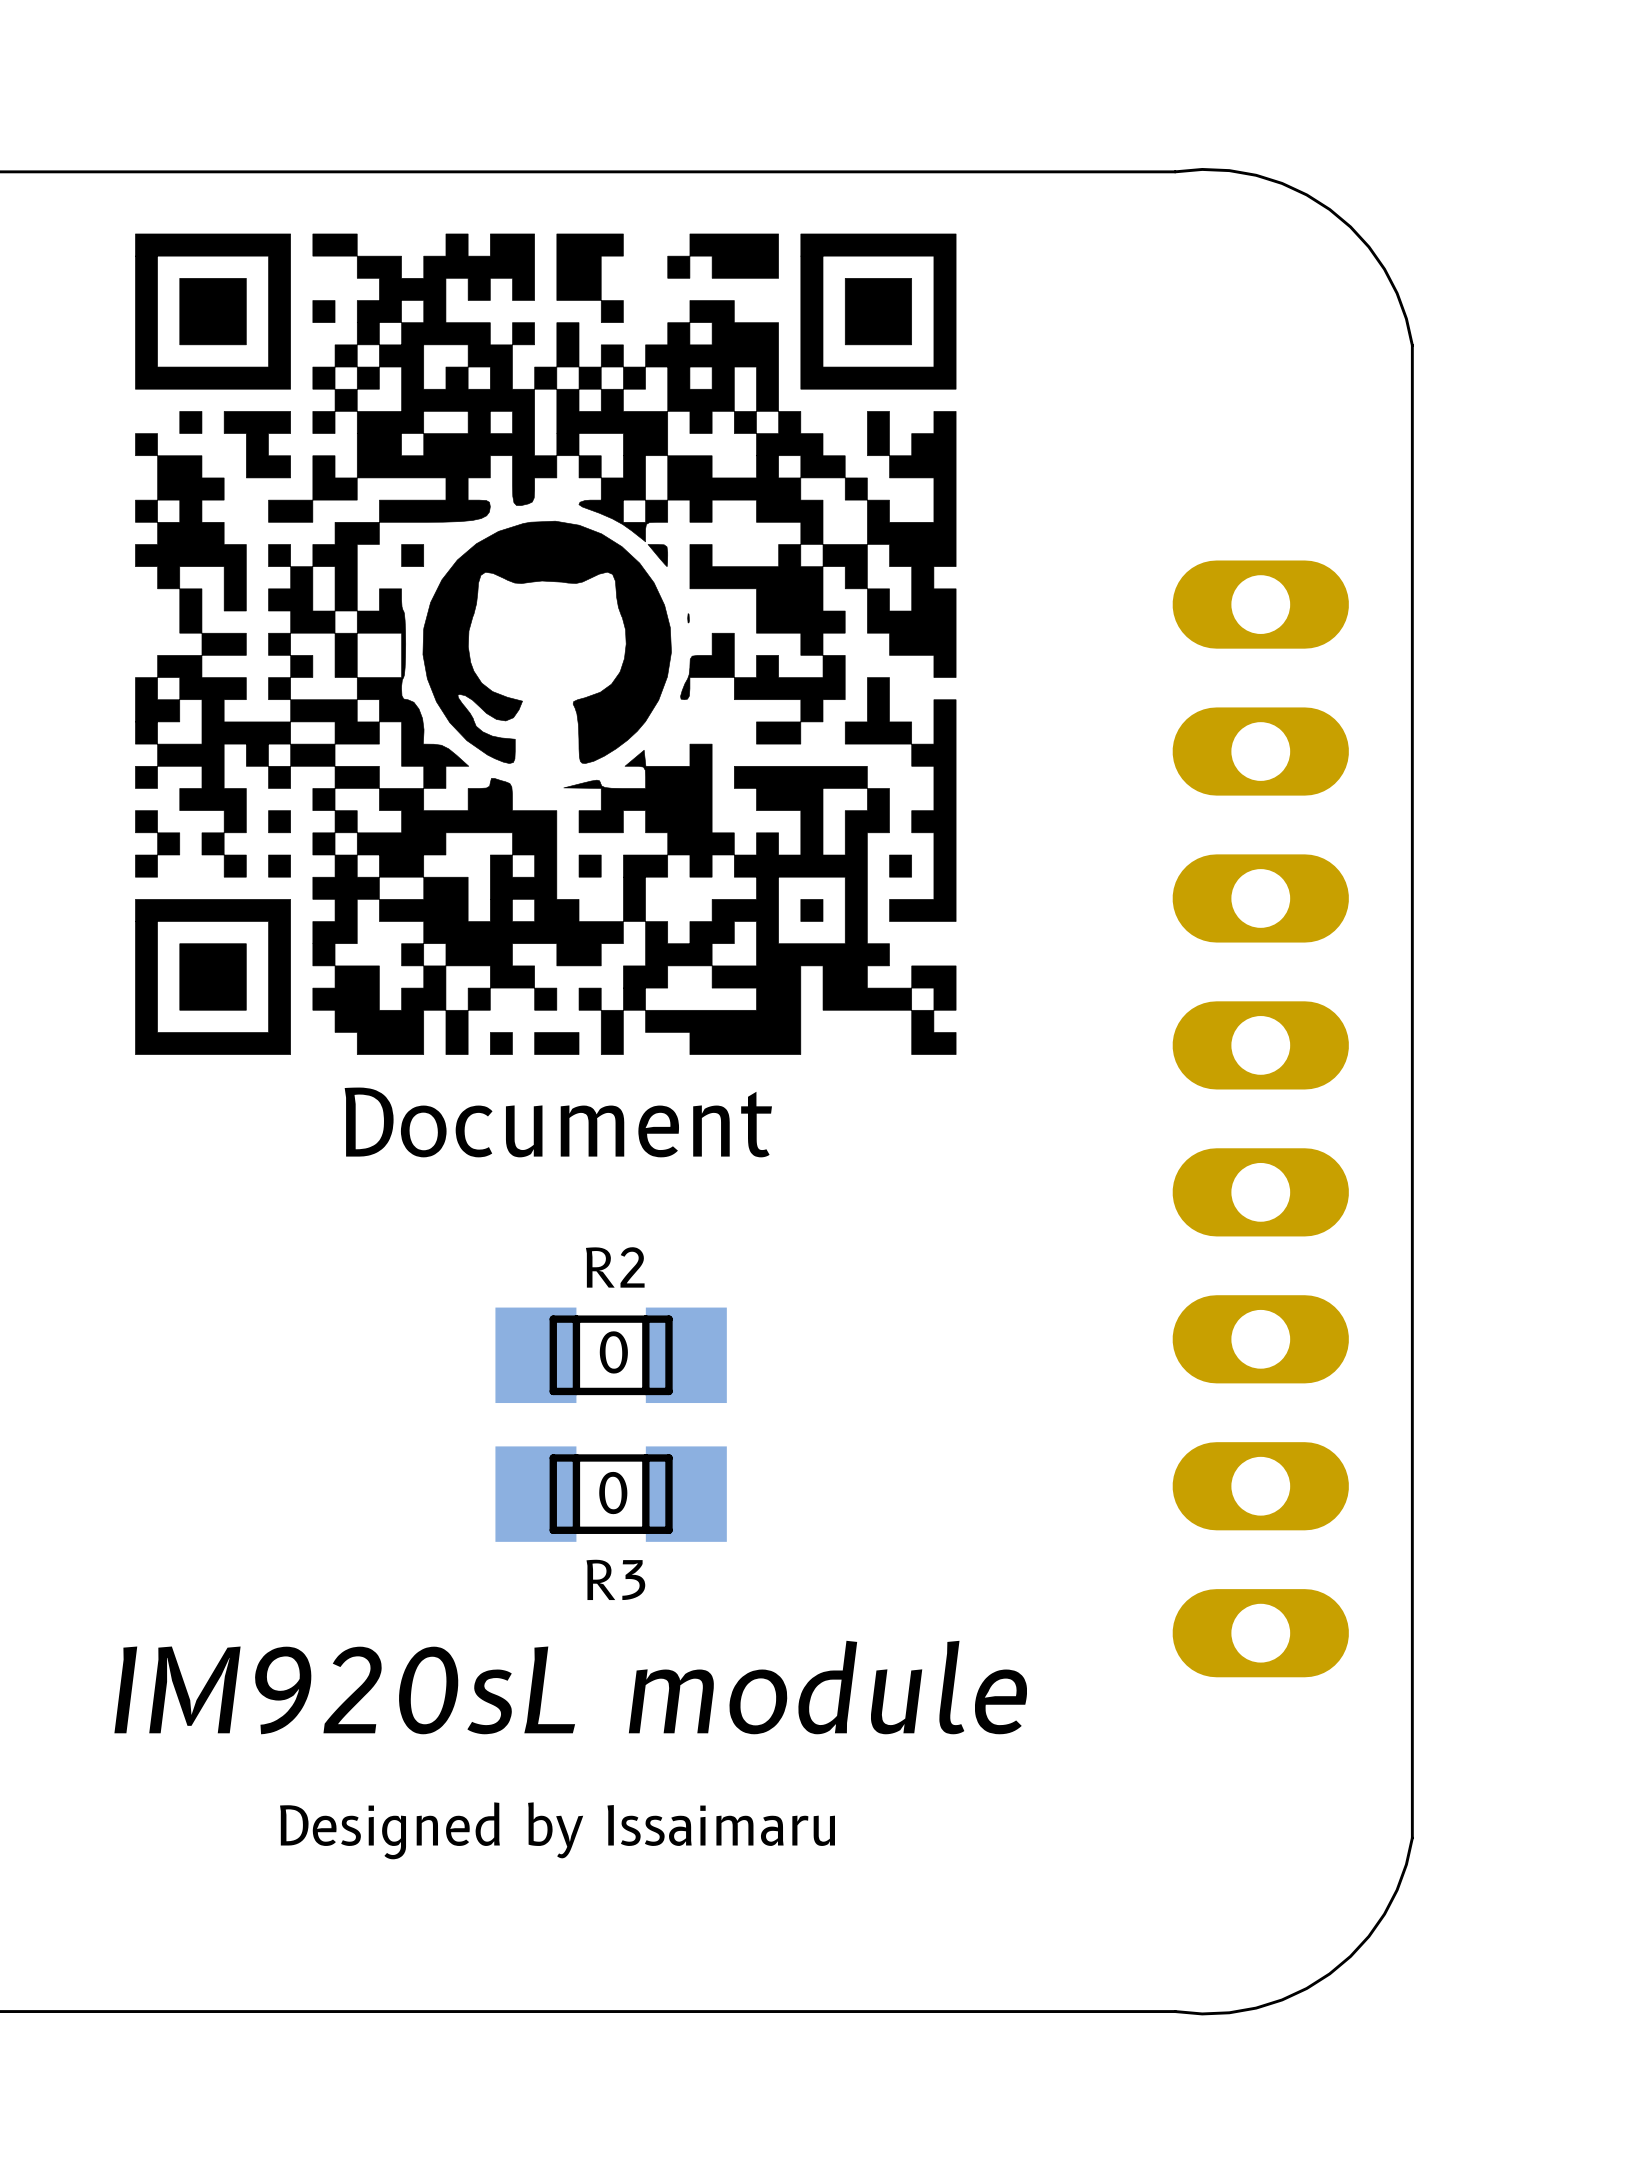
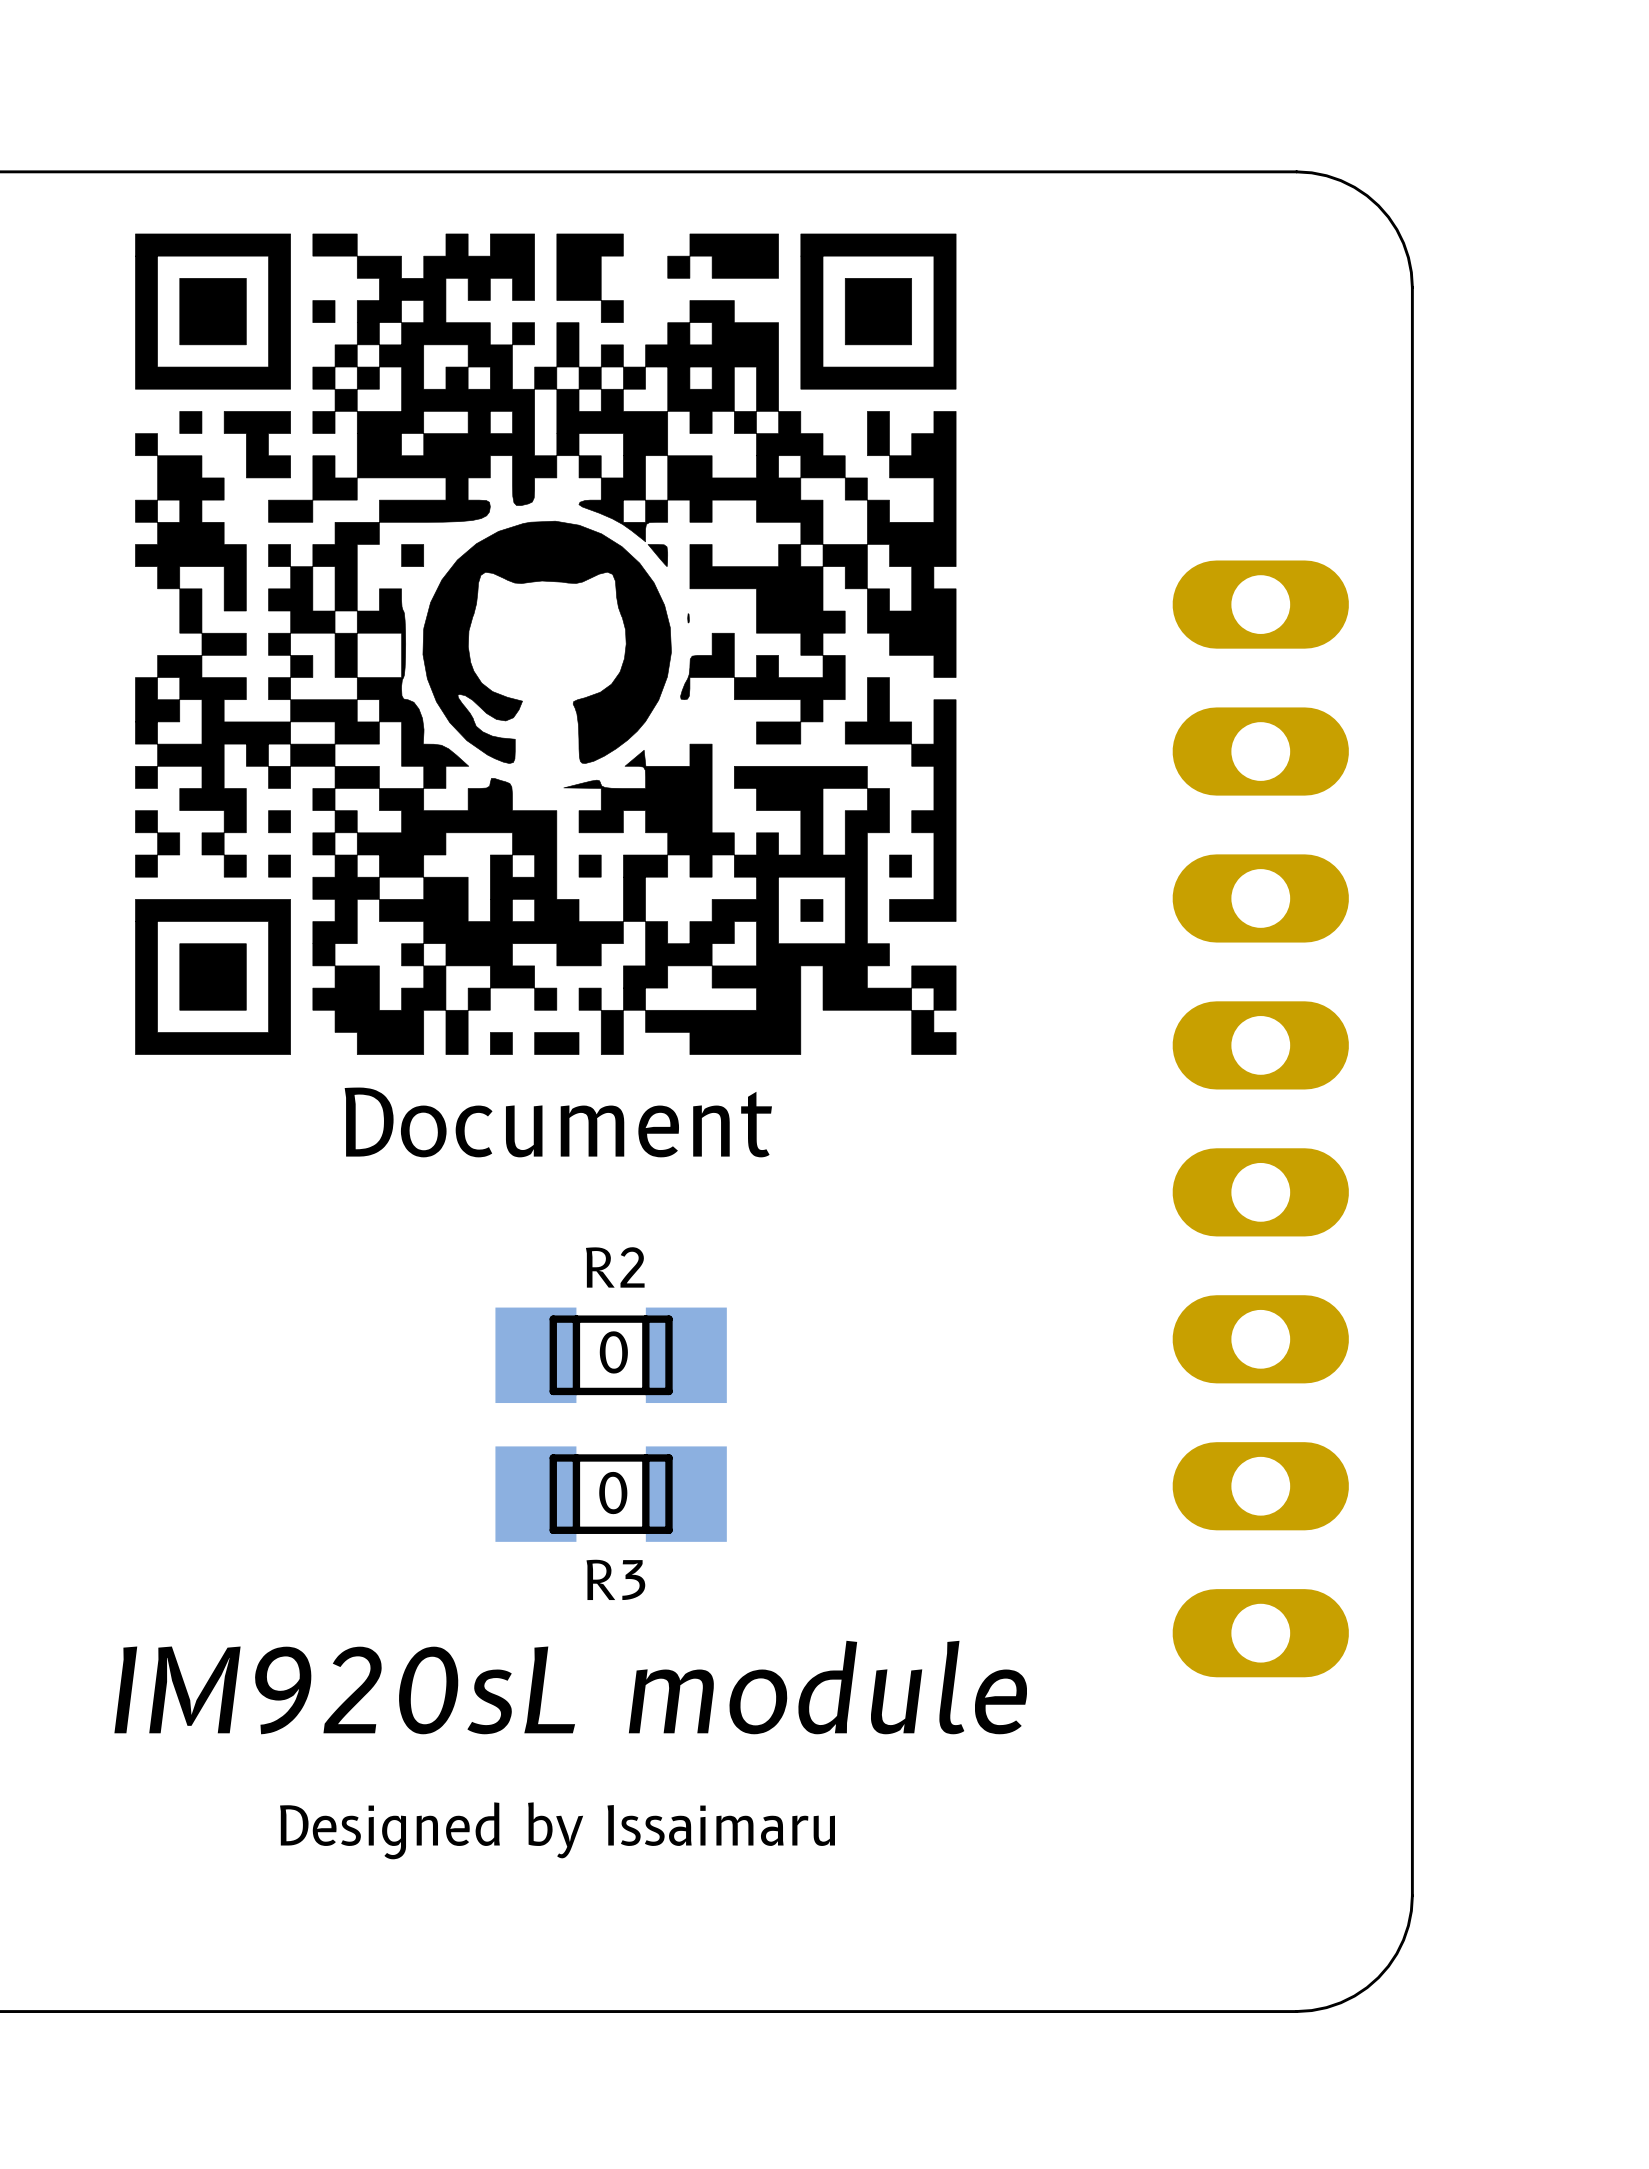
board edge: (1175, 171) (1202, 169) (1229, 170) (1256, 175) (1282, 183) (1306, 194) (1329, 209) (1350, 226) (1368, 246) (1384, 269) (1397, 293) (1406, 318) (1412, 345) -> (1175, 171) (1311, 172) (1340, 180) (1367, 195) (1388, 217) (1396, 229) (1408, 257) (1412, 287) (1412, 345)
board edge: (1412, 1837) (1406, 1864) (1397, 1890) (1384, 1914) (1368, 1936) (1350, 1956) (1329, 1973) (1306, 1988) (1282, 1999) (1256, 2008) (1229, 2012) (1202, 2013) (1175, 2011) -> (1412, 1837) (1412, 1895) (1408, 1925) (1396, 1953) (1388, 1966) (1367, 1987) (1340, 2002) (1311, 2010) (1175, 2011)

